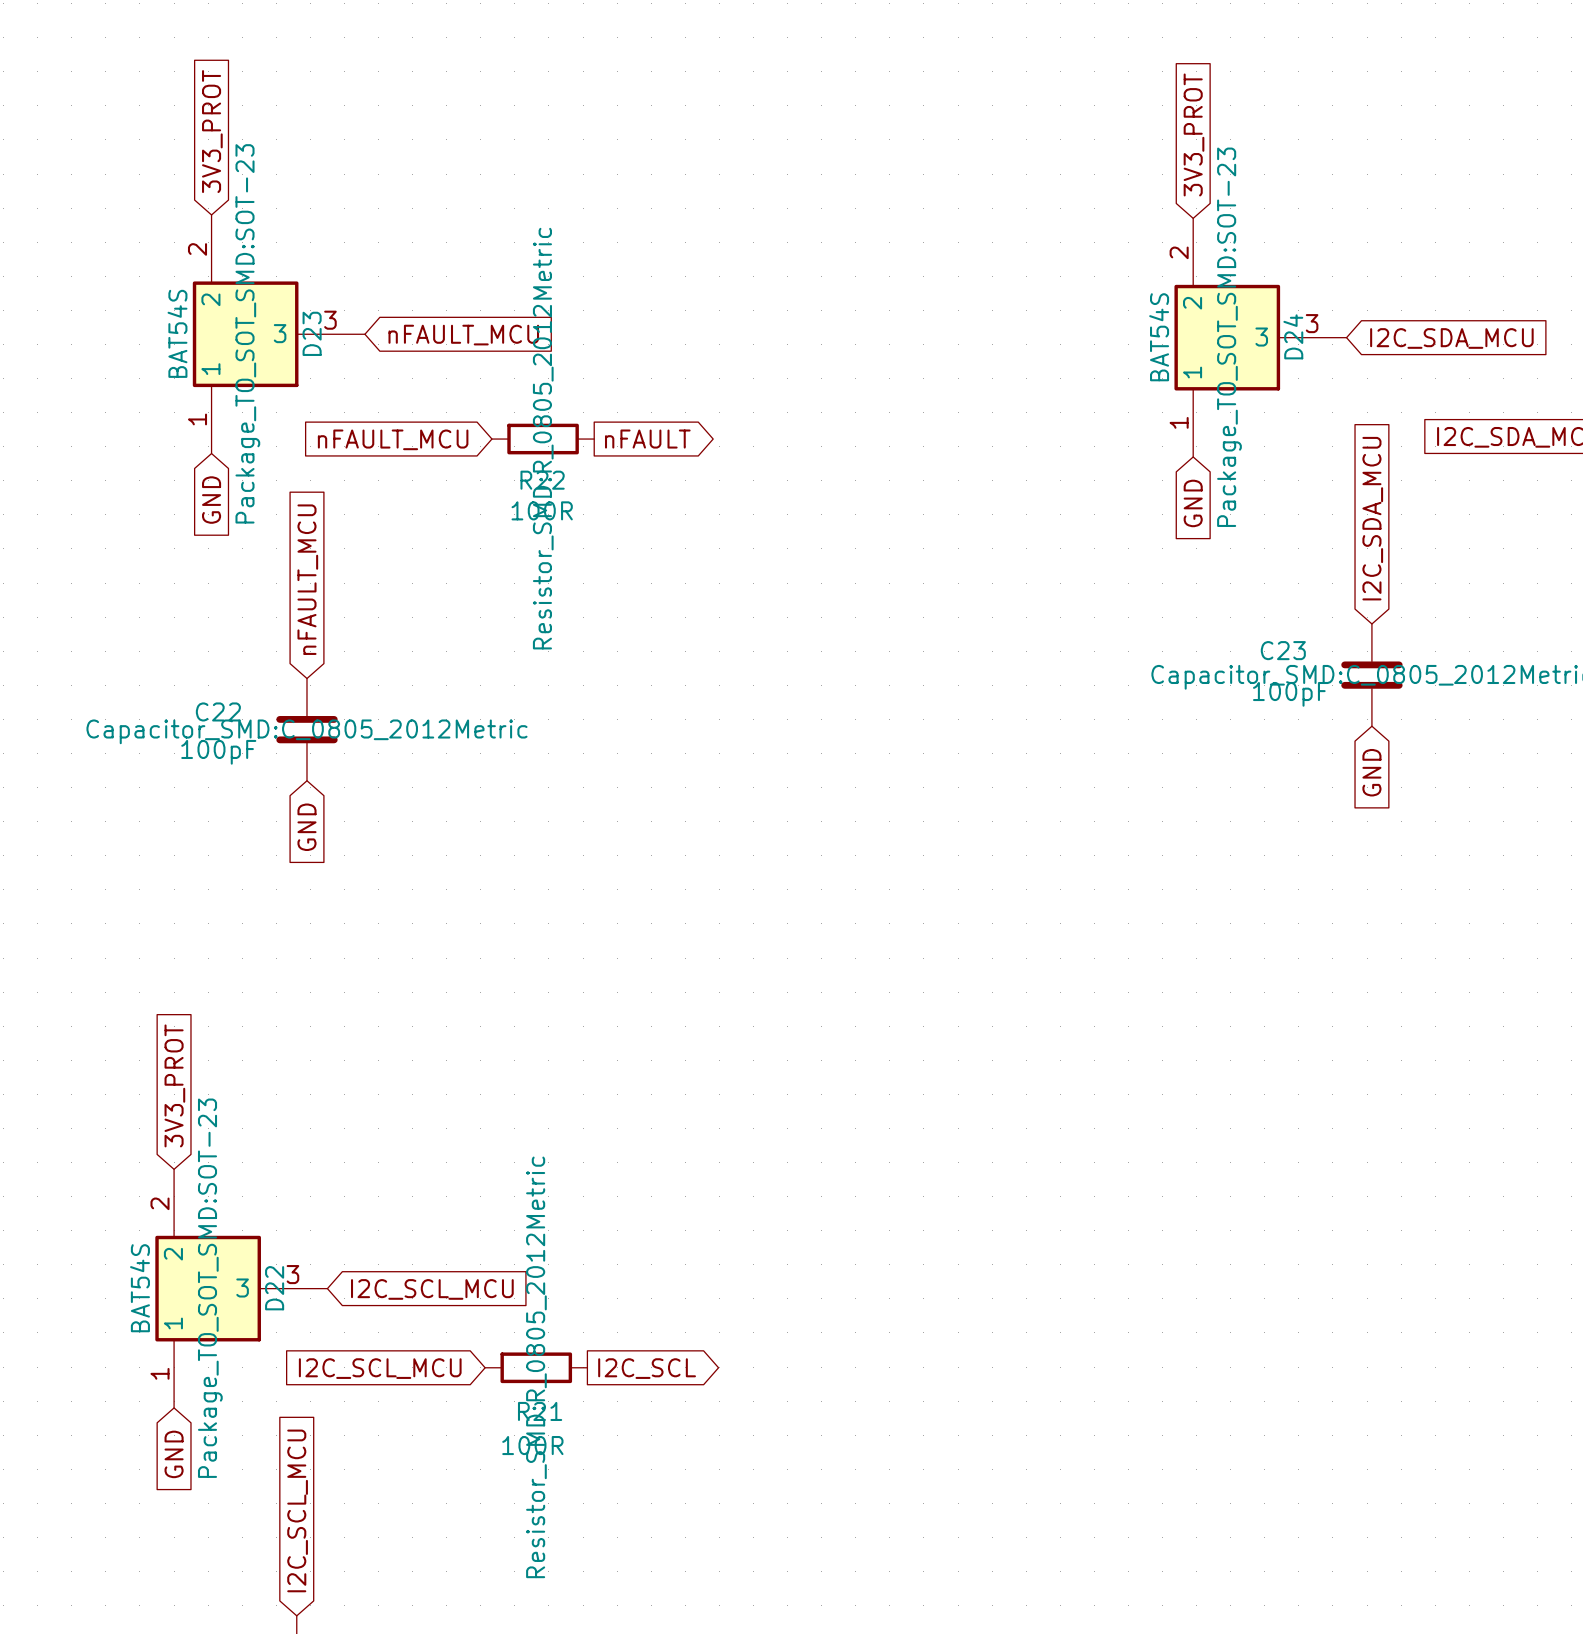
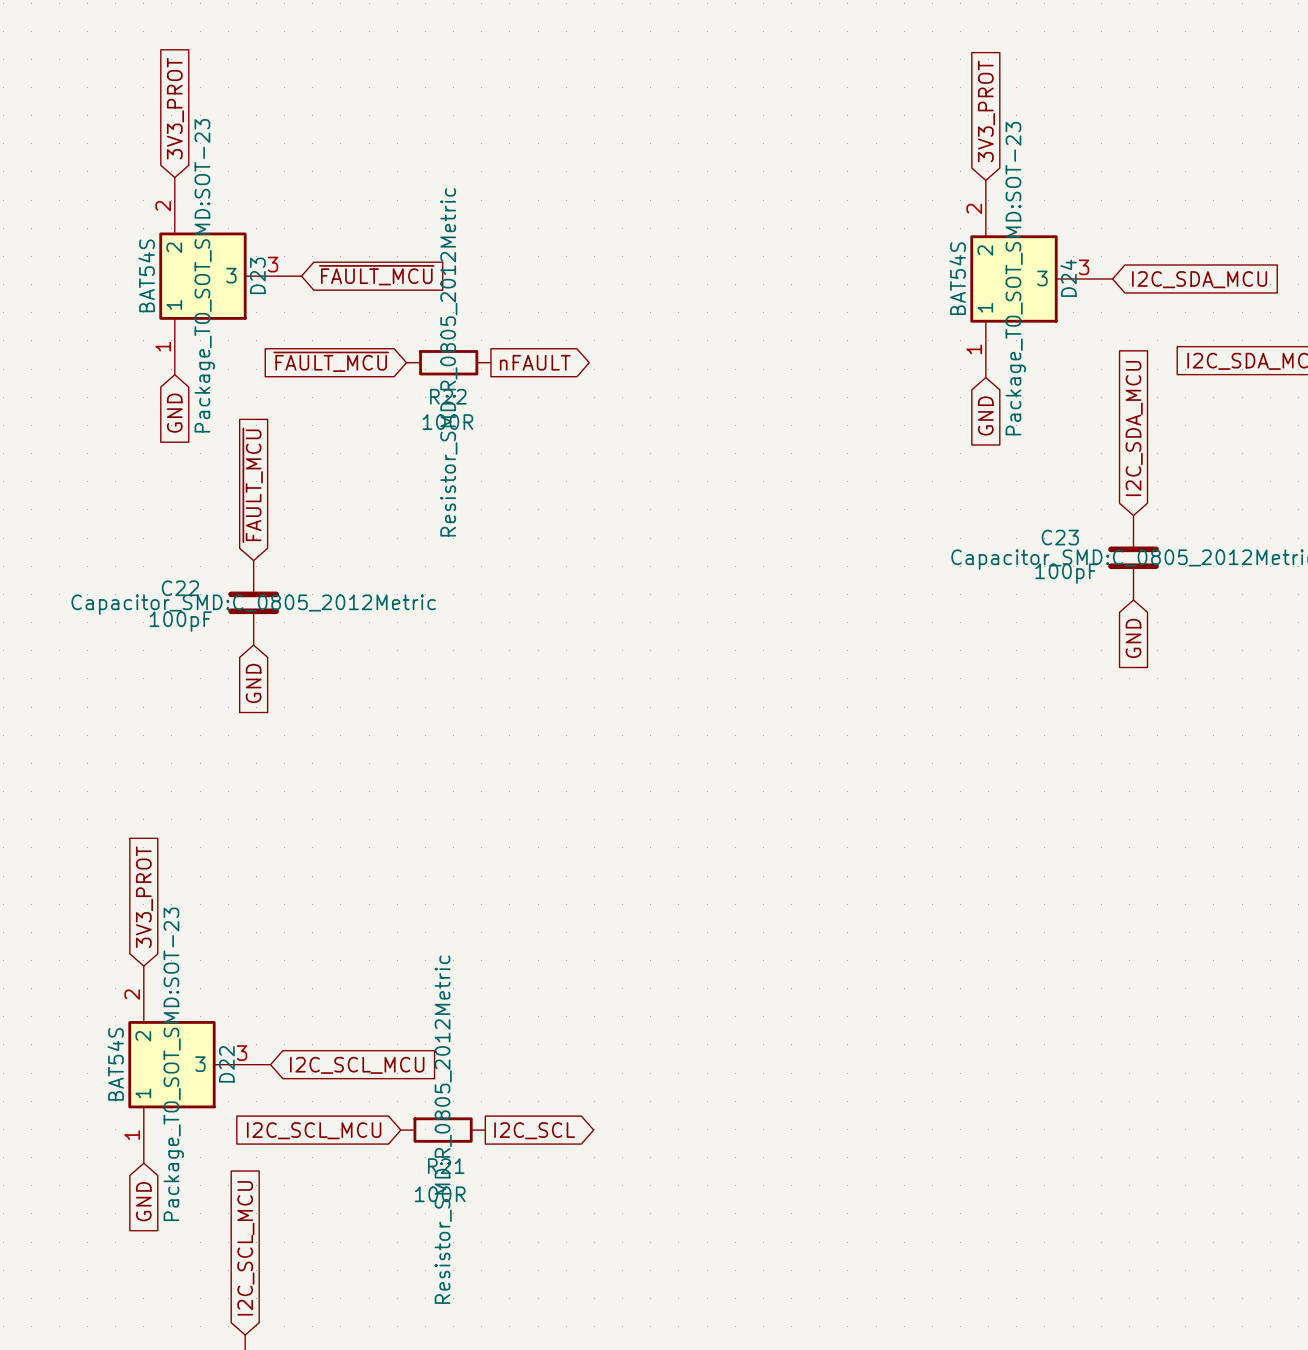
global label: nFAULT_MCU (463, 335) -> ~{FAULT_MCU} (376, 275)
global label: nFAULT_MCU (393, 439) -> ~{FAULT_MCU} (331, 361)
global label: nFAULT_MCU (307, 579) -> ~{FAULT_MCU} (252, 485)

